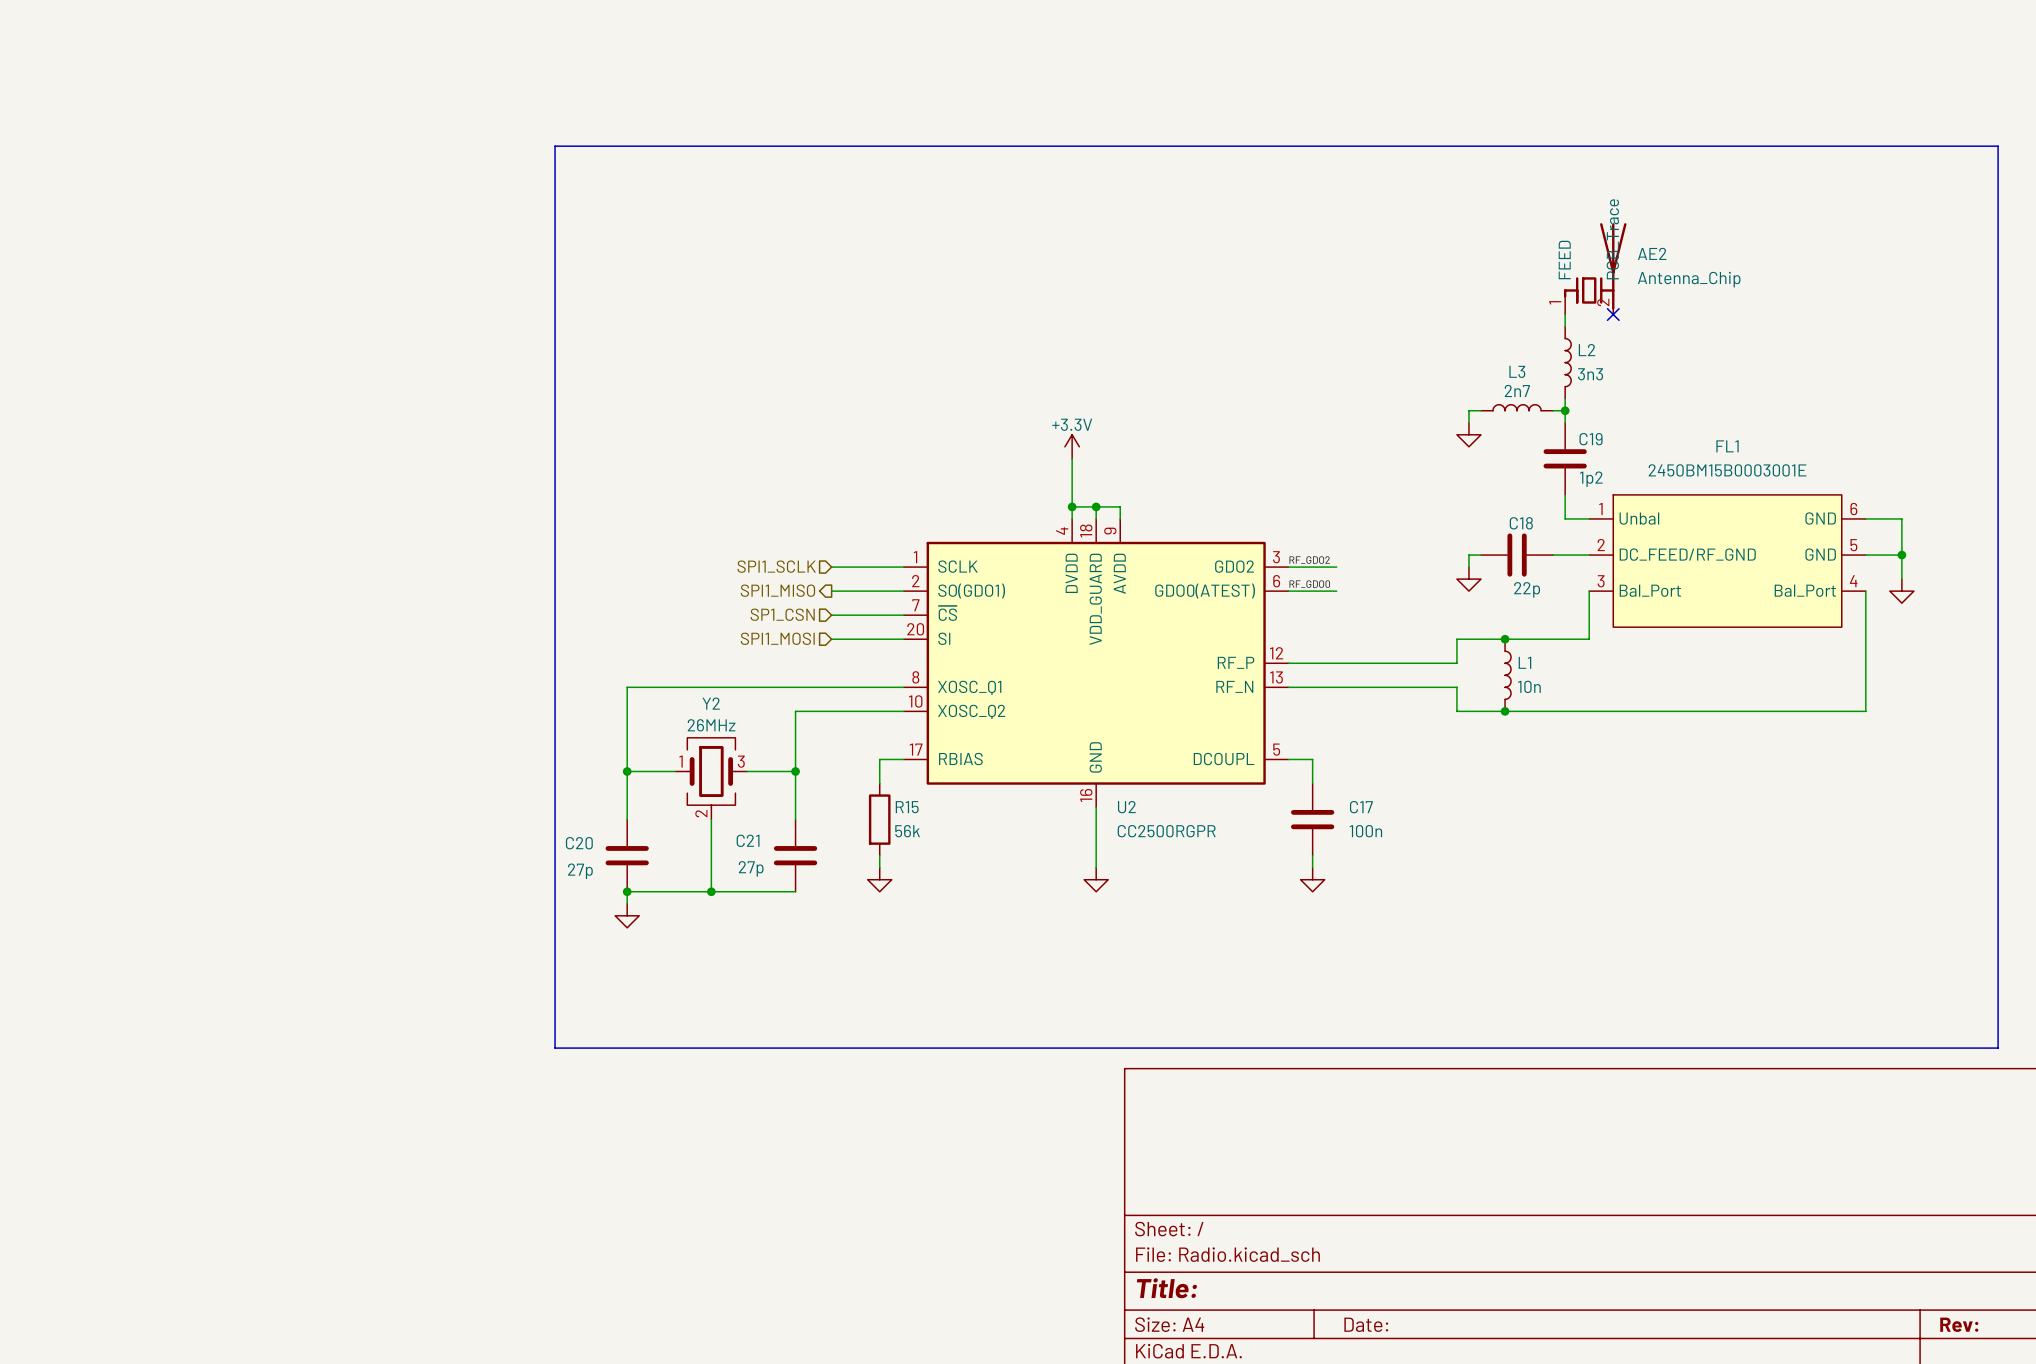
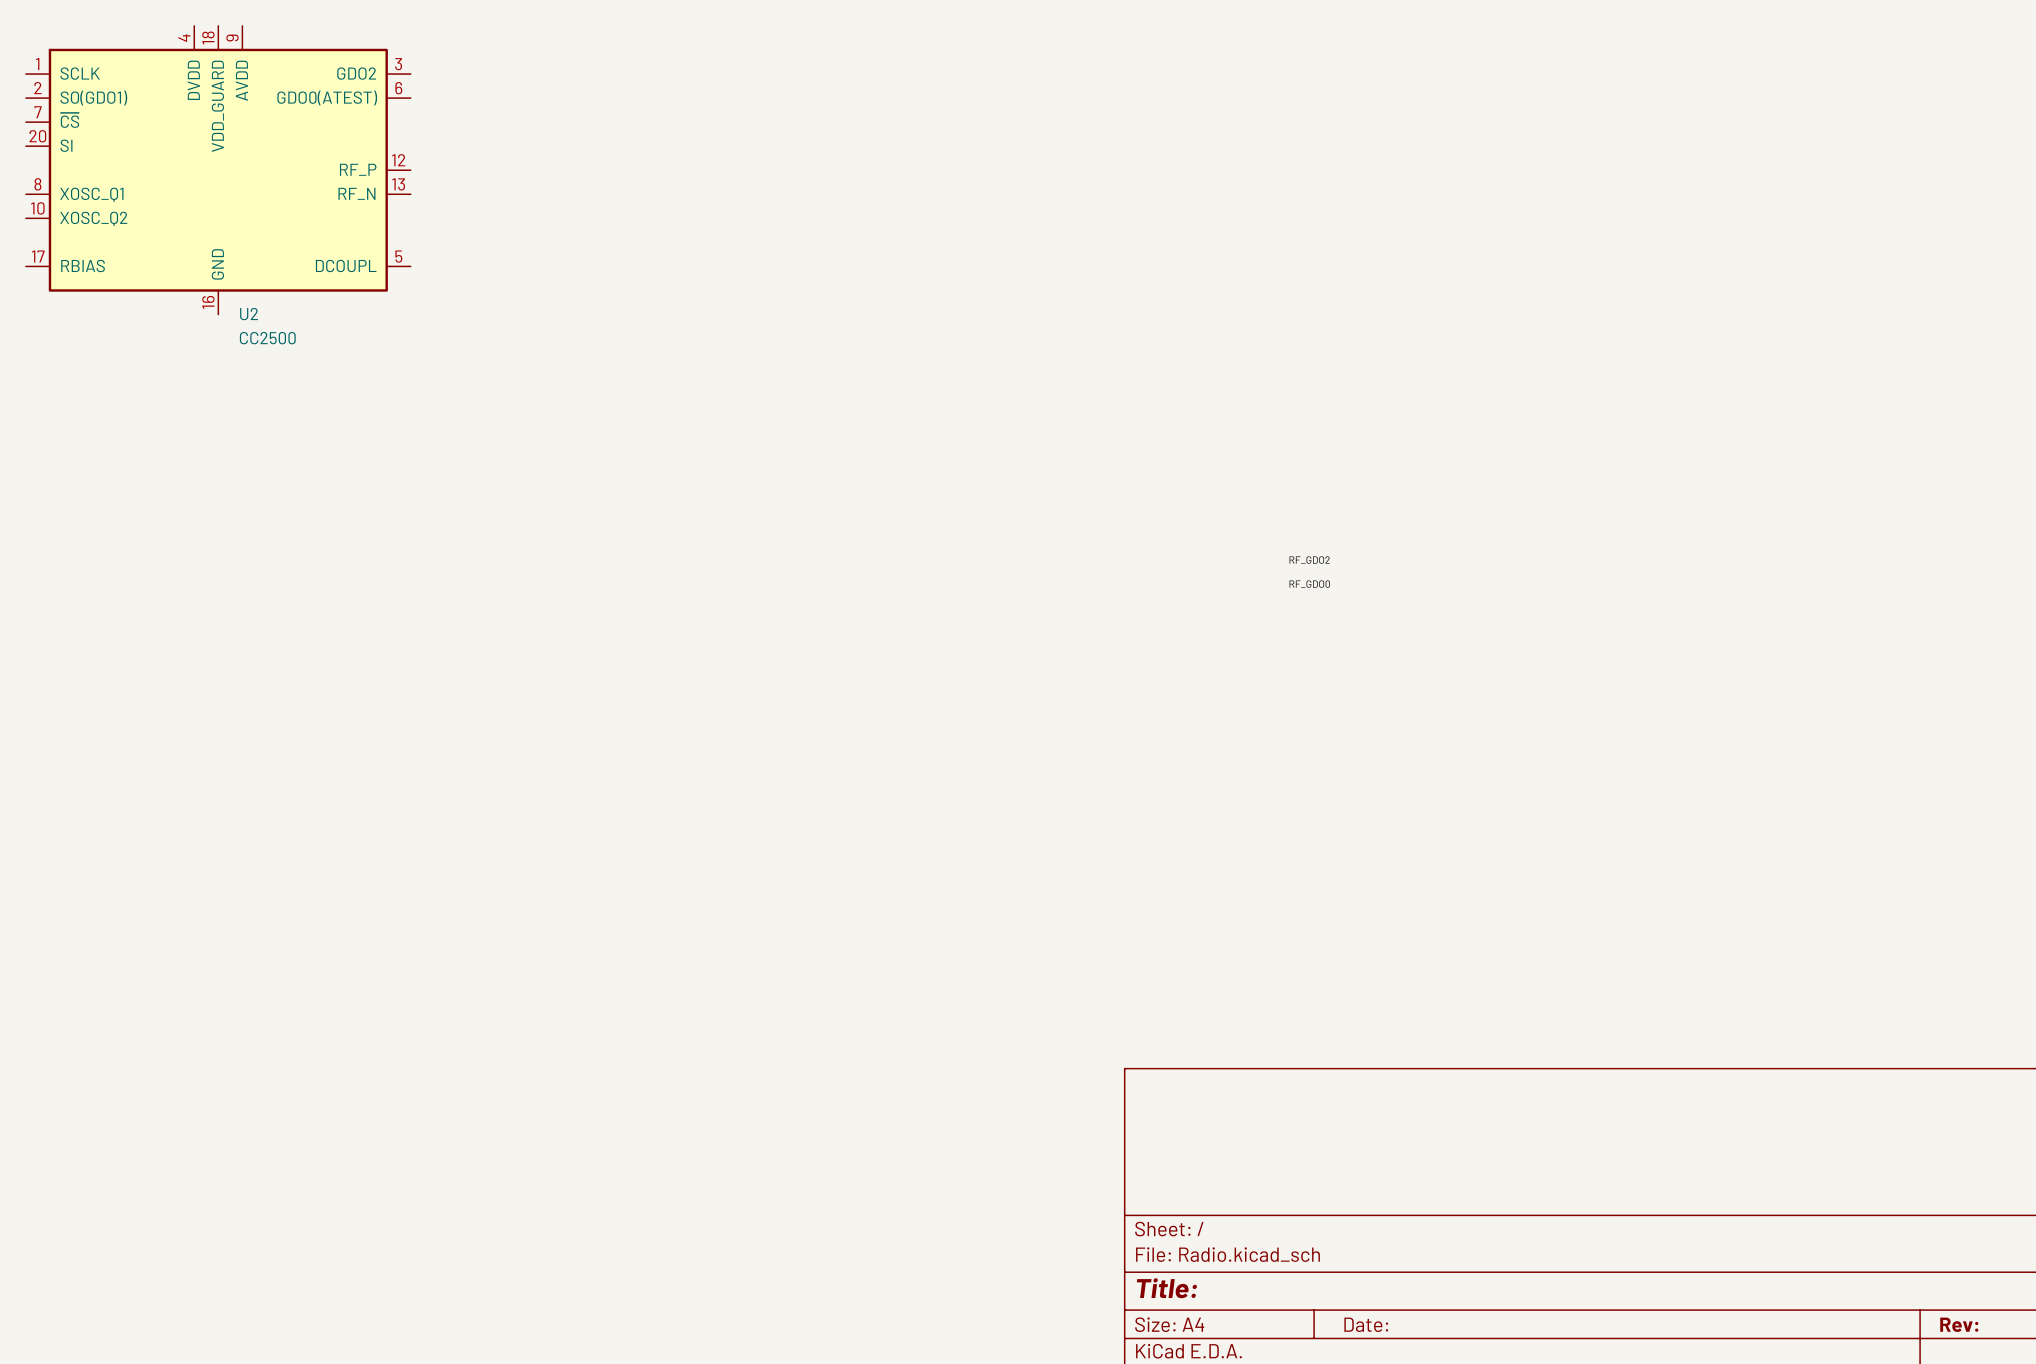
line: (555, 146) (1998, 146) (1998, 1048) (555, 1048) (555, 146) -> none
AE2: Antenna_Chip (1595, 268) -> none
wire: (1565, 314) (1565, 326) -> none
no-connect mark: (1613, 314) -> none
L2: 3n3 (1568, 362) -> none
wire: (1565, 398) (1565, 422) -> none
L3: 2n7 (1517, 407) -> none
wire: (1480, 410) (1468, 410) (1468, 422) -> none
wire: (1553, 410) (1565, 410) -> none
junction: (1565, 410) -> none
power symbol: (1468, 434) -> none
power symbol: +3.3V (1072, 446) -> none
wire: (1072, 458) (1072, 518) -> none
C19: 1p2 (1565, 458) -> none
wire: (1565, 494) (1565, 518) (1589, 518) -> none
wire: (1072, 506) (1120, 506) (1120, 518) -> none
junction: (1072, 506) -> none
wire: (1096, 506) (1096, 518) -> none
junction: (1096, 506) -> none
wire: (1865, 518) (1901, 518) (1901, 579) -> none
wire: (1480, 555) (1468, 555) (1468, 567) -> none
C18: 22p (1517, 555) -> none
wire: (1553, 555) (1589, 555) -> none
wire: (1865, 555) (1901, 555) -> none
junction: (1901, 555) -> none
FL1: 2450BM15B0003001E (1727, 561) -> none
hierarchical label: SPI1_SCLK (776, 566) -> none
wire: (831, 567) (903, 567) -> none
wire: (1288, 567) (1336, 567) -> none
power symbol: (1468, 579) -> none
hierarchical label: SPI1_MISO (777, 590) -> none
wire: (831, 591) (903, 591) -> none
wire: (1288, 591) (1336, 591) -> none
wire: (1589, 591) (1589, 639) (1456, 639) (1456, 663) (1288, 663) -> none
wire: (1865, 591) (1865, 711) (1456, 711) (1456, 687) (1288, 687) -> none
power symbol: (1901, 591) -> none
hierarchical label: SP1_CSN (782, 614) -> none
wire: (831, 615) (903, 615) -> none
hierarchical label: SPI1_MOSI (777, 638) -> none
wire: (831, 639) (903, 639) -> none
junction: (1505, 639) -> none
U2 position: (1096, 663) -> (218, 170)
L1: 10n (1508, 675) -> none
wire: (903, 687) (627, 687) (627, 819) -> none
wire: (903, 711) (795, 711) (795, 819) -> none
junction: (1505, 711) -> none
wire: (903, 759) (879, 759) (879, 783) -> none
wire: (1288, 759) (1312, 759) (1312, 783) -> none
wire: (627, 771) (675, 771) -> none
junction: (627, 771) -> none
wire: (747, 771) (795, 771) -> none
junction: (795, 771) -> none
Y2: 26MHz (711, 778) -> none
wire: (1096, 807) (1096, 867) -> none
wire: (711, 819) (711, 891) -> none
R15: 56k (879, 819) -> none
C17: 100n (1312, 819) -> none
U2 value: CC2500RGPR (1166, 831) -> CC2500 (267, 338)
C20: 27p (627, 855) -> none
C21: 27p (795, 855) -> none
wire: (879, 855) (879, 867) -> none
wire: (1312, 855) (1312, 867) -> none
power symbol: (879, 879) -> none
power symbol: (1096, 879) -> none
power symbol: (1312, 879) -> none
junction: (627, 891) -> none
junction: (711, 891) -> none
wire: (795, 891) (627, 891) (627, 903) -> none
power symbol: (627, 915) -> none

